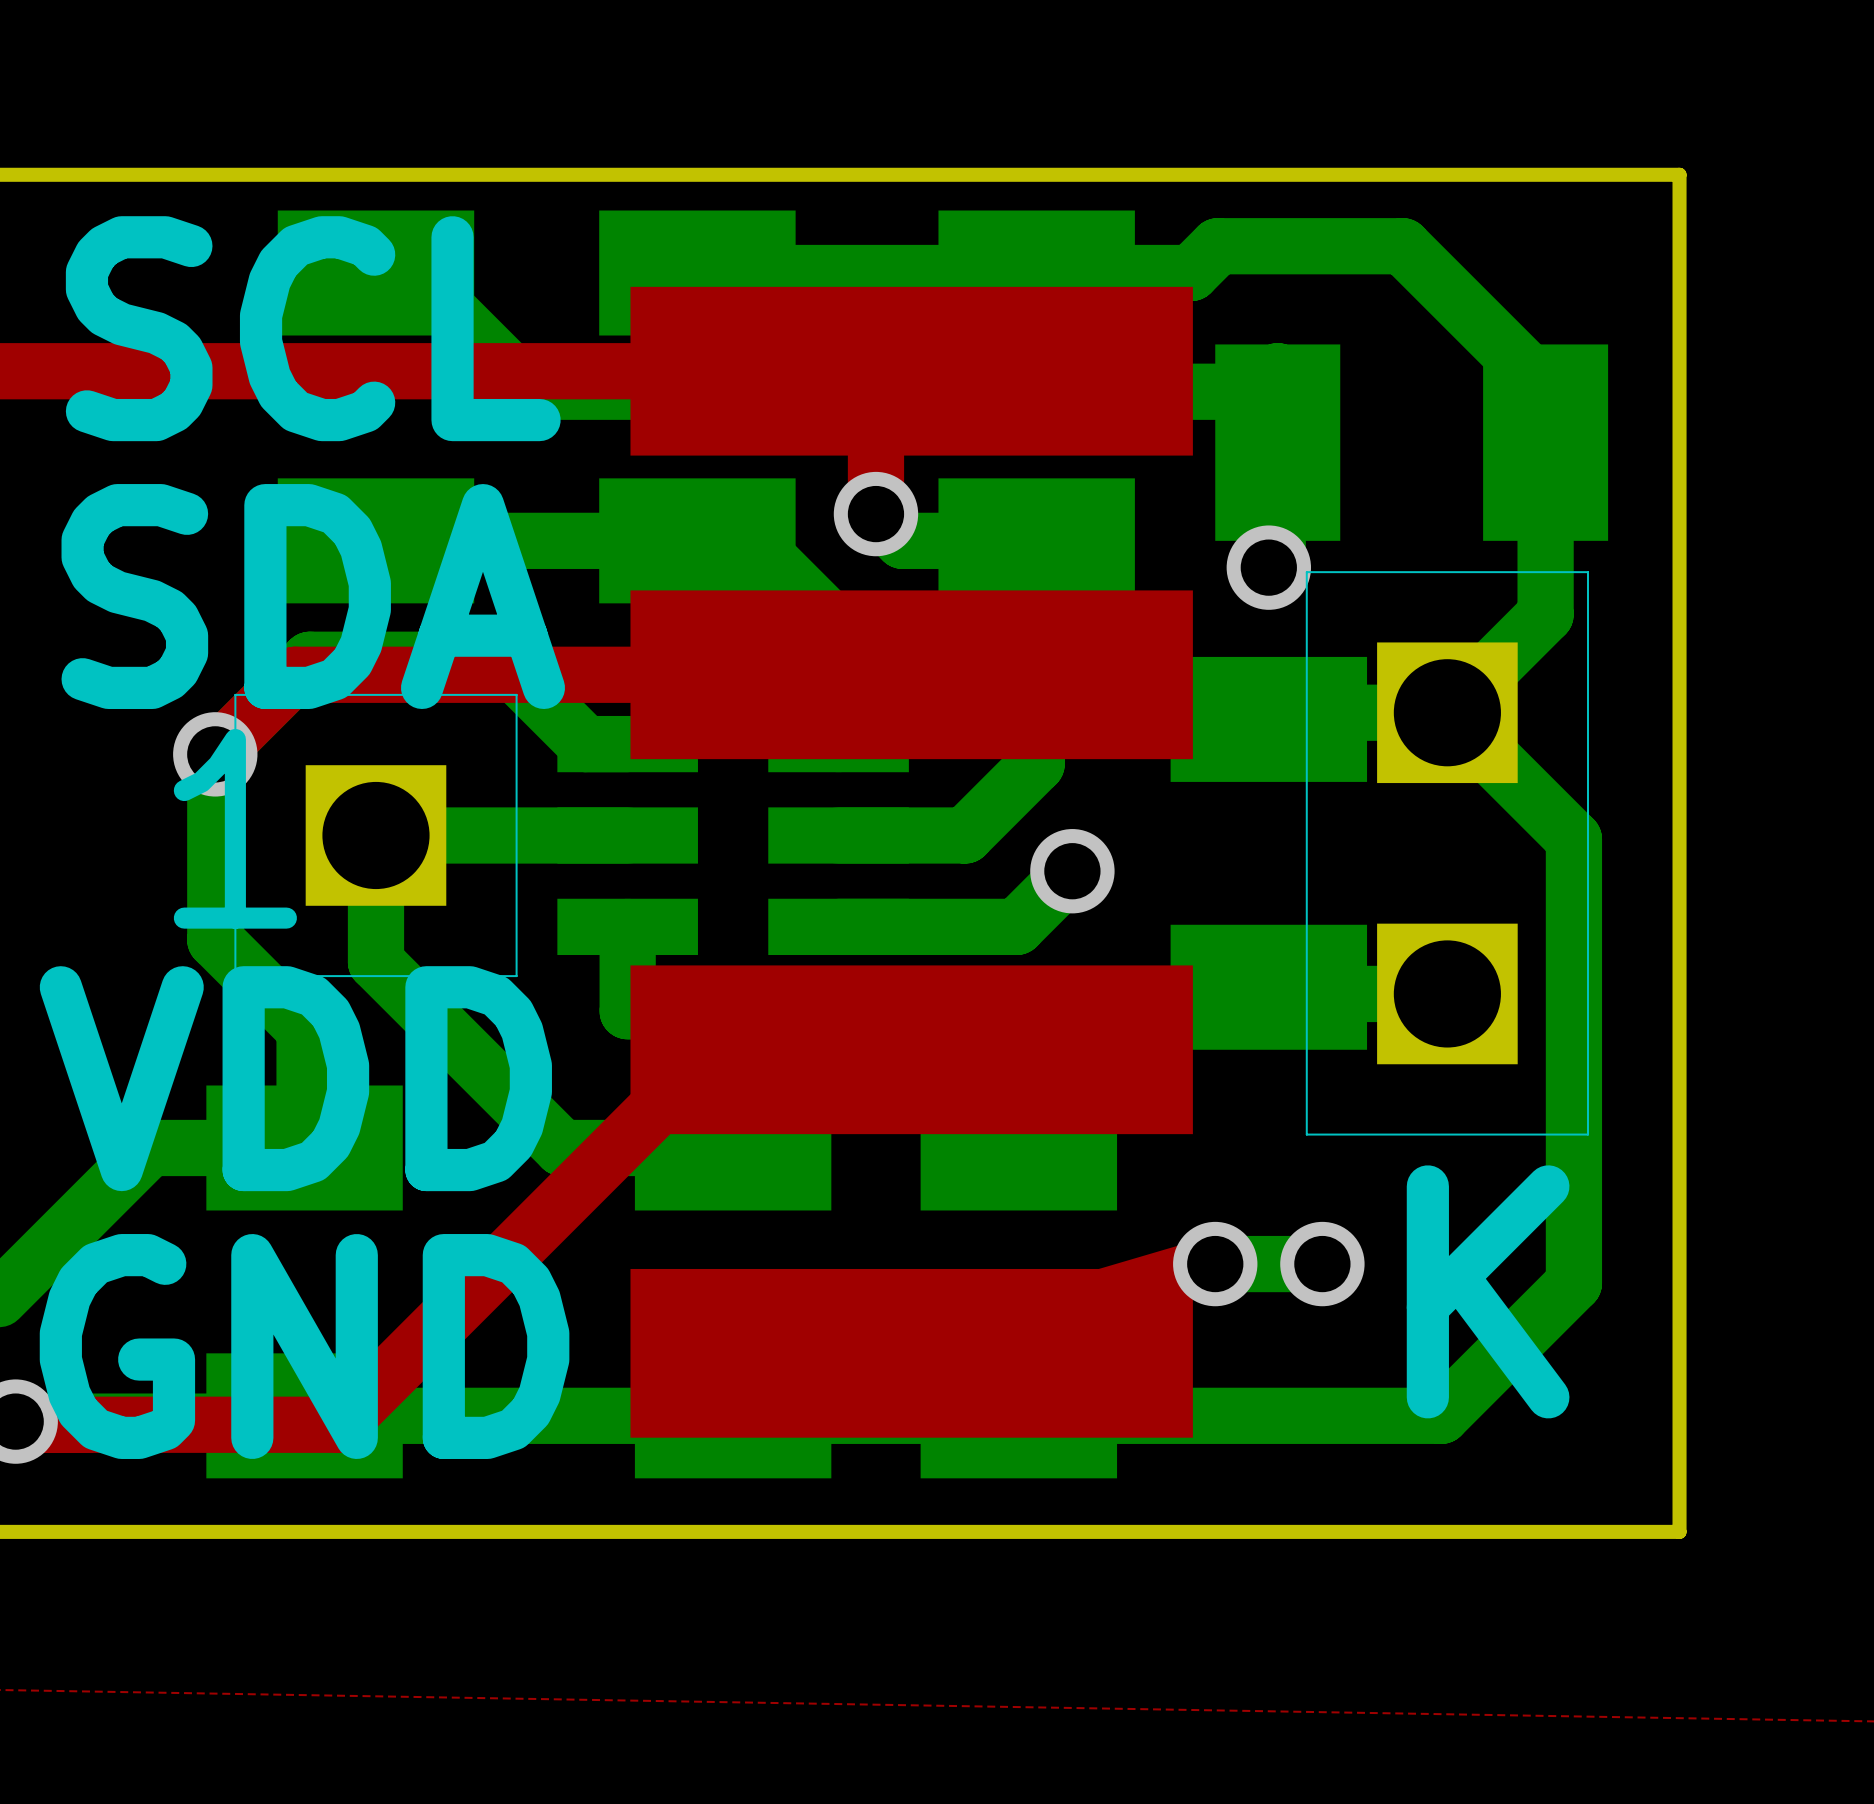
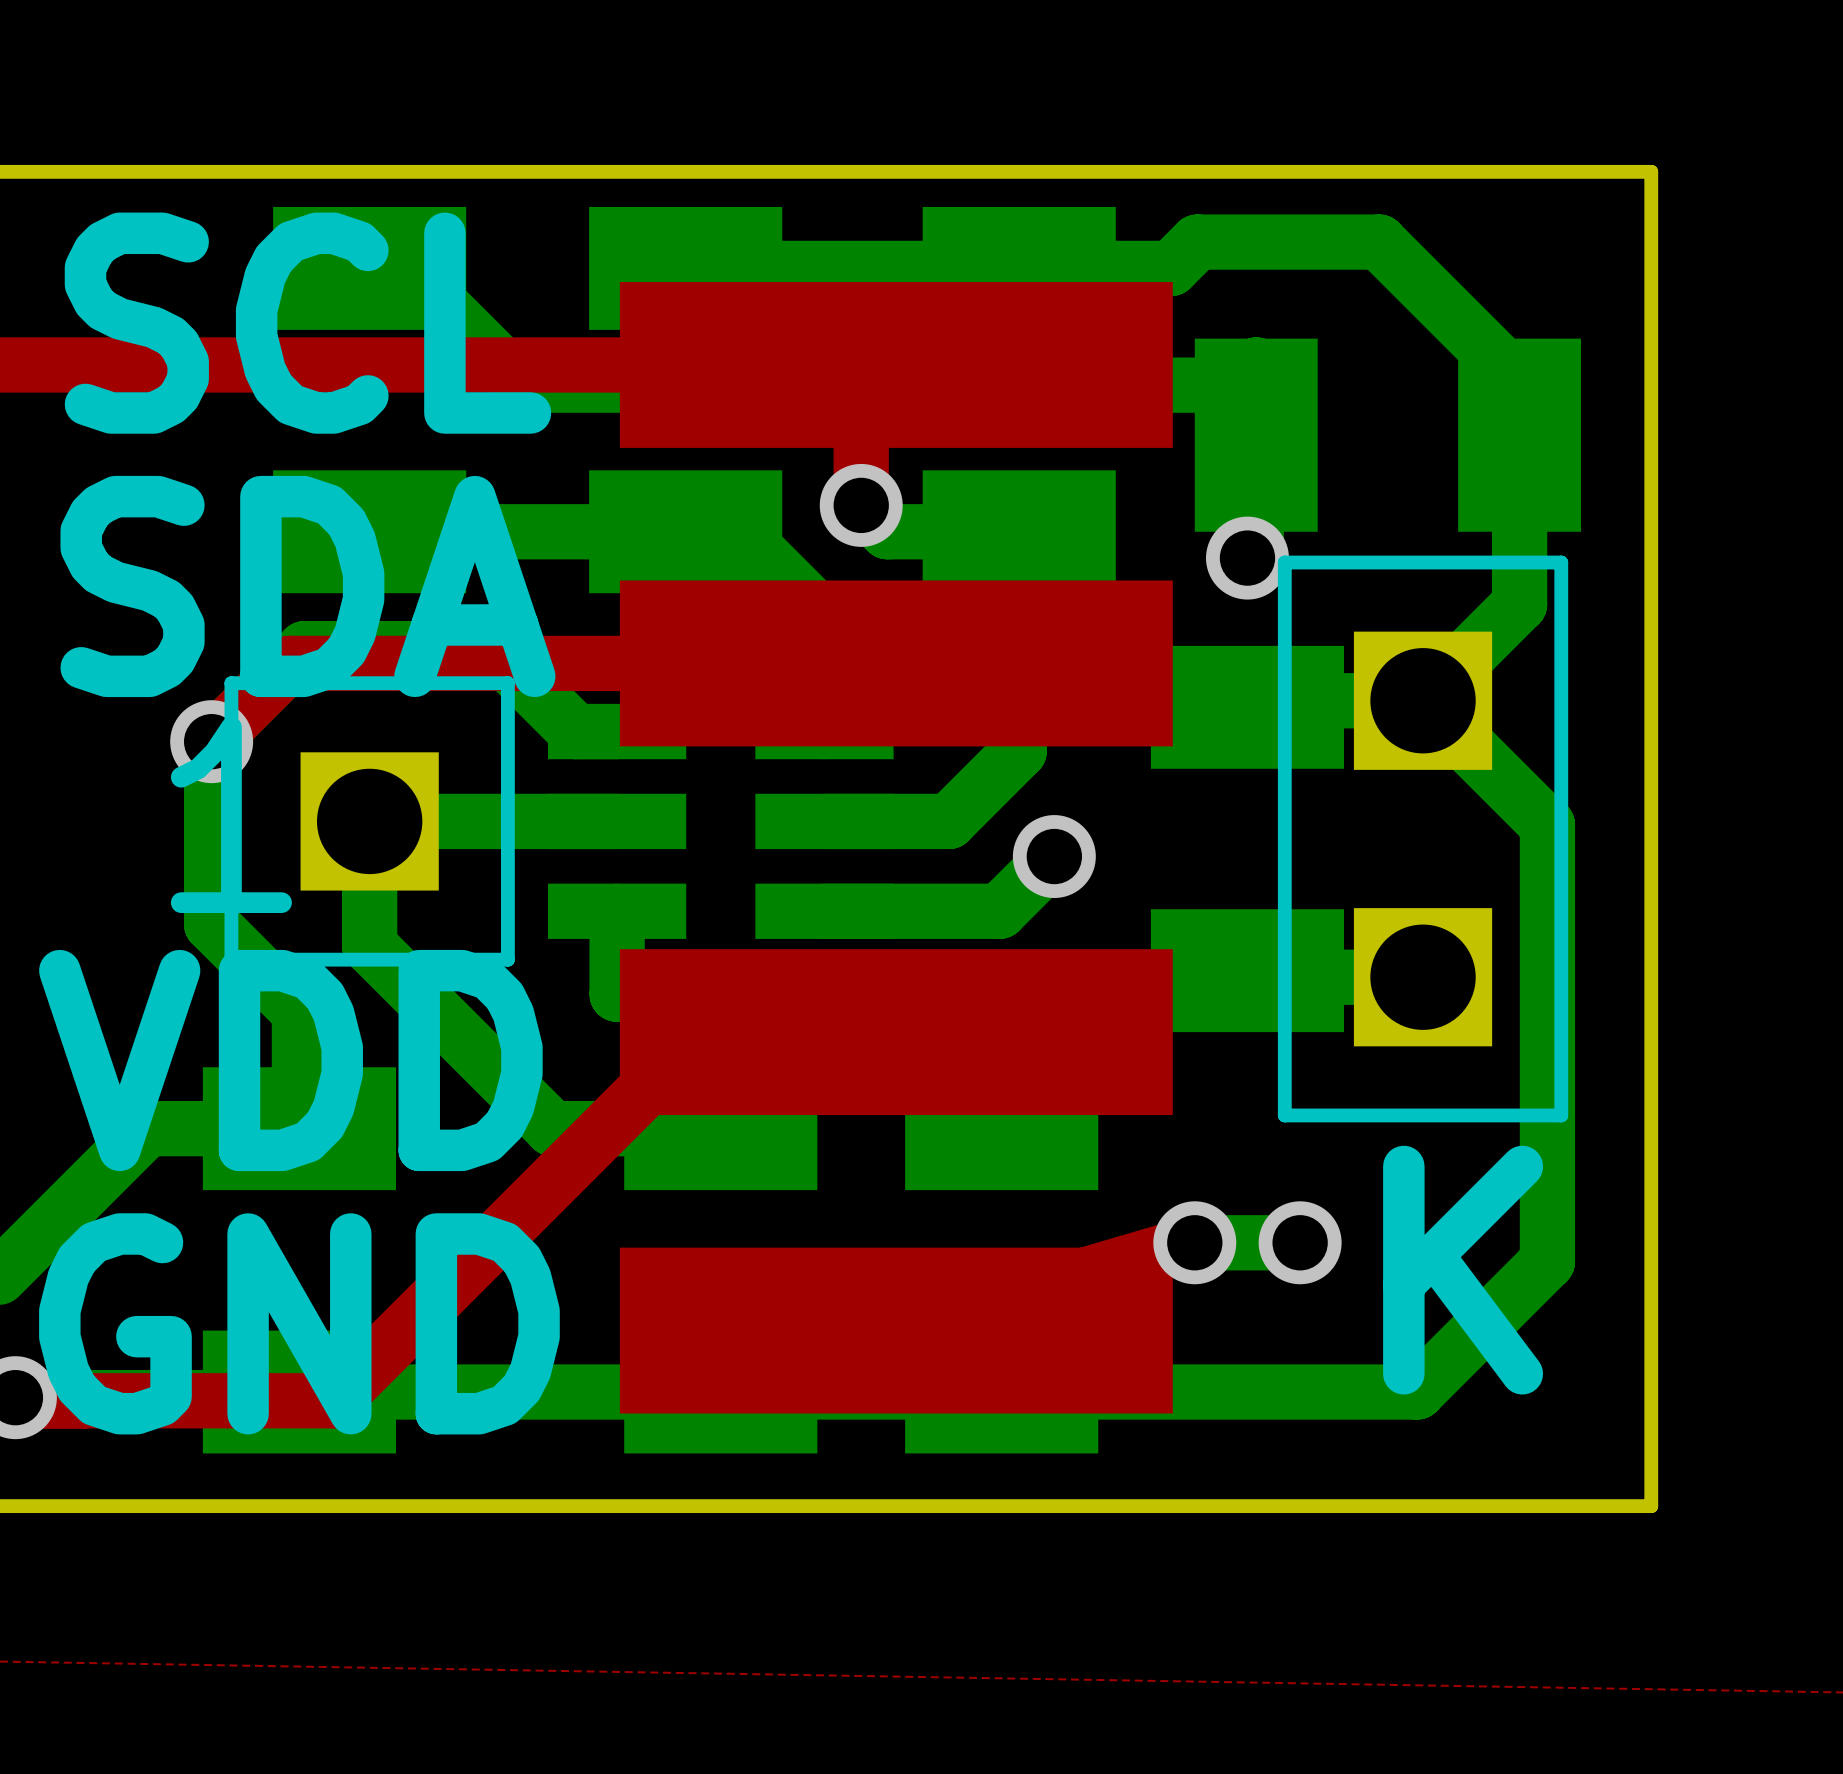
part footprint: [1306, 572, 1588, 1135] -> [1277, 555, 1569, 1123]
part footprint: [235, 694, 517, 977] -> [224, 676, 515, 967]

